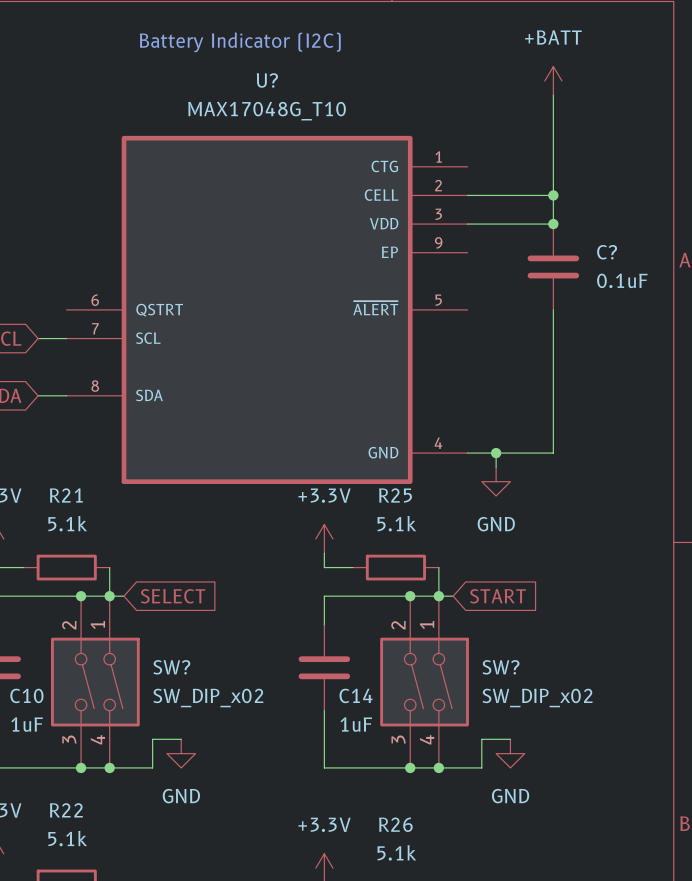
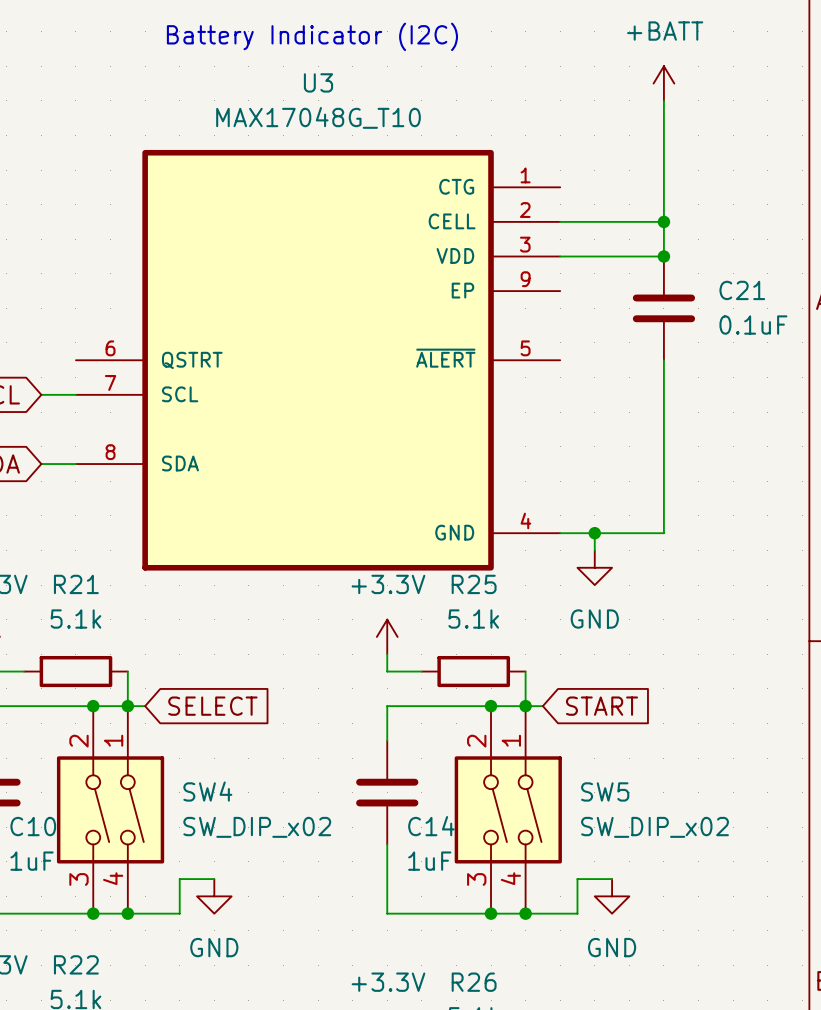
U? name: U? (267, 80) -> U3 (318, 82)
C? name: C? (607, 252) -> C21 (742, 290)
SW? name: SW? (171, 667) -> SW4 (207, 791)
SW? name: SW? (501, 667) -> SW5 (605, 791)

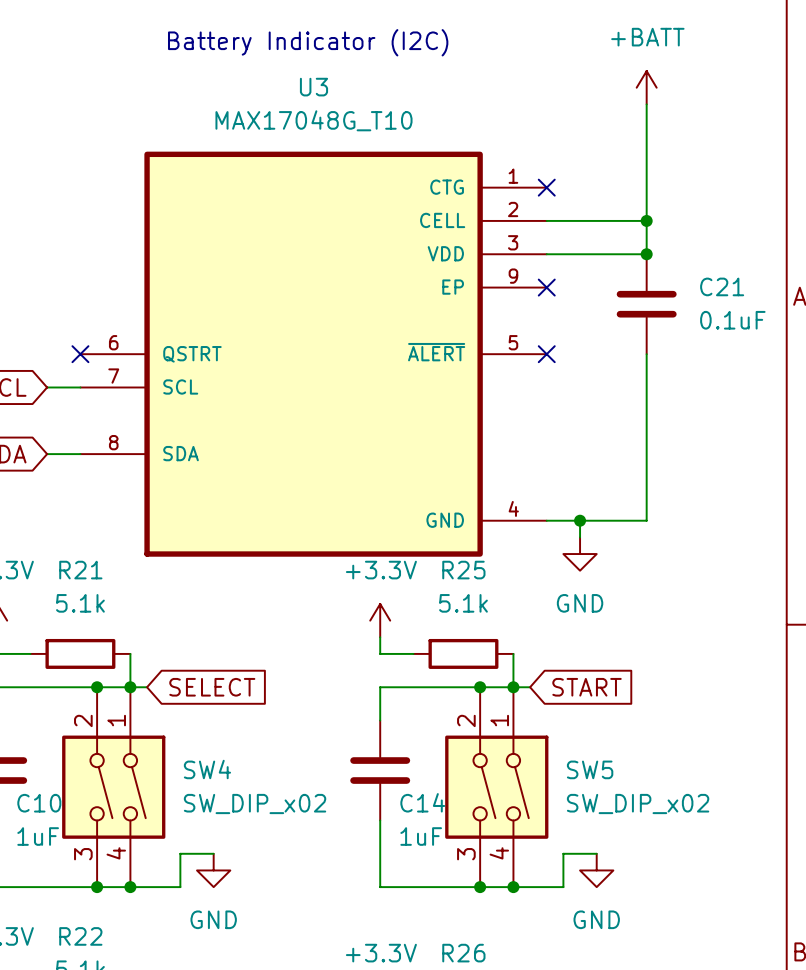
no-connect mark: none -> (546, 187)
no-connect mark: none -> (546, 287)
no-connect mark: none -> (80, 354)
no-connect mark: none -> (546, 354)

